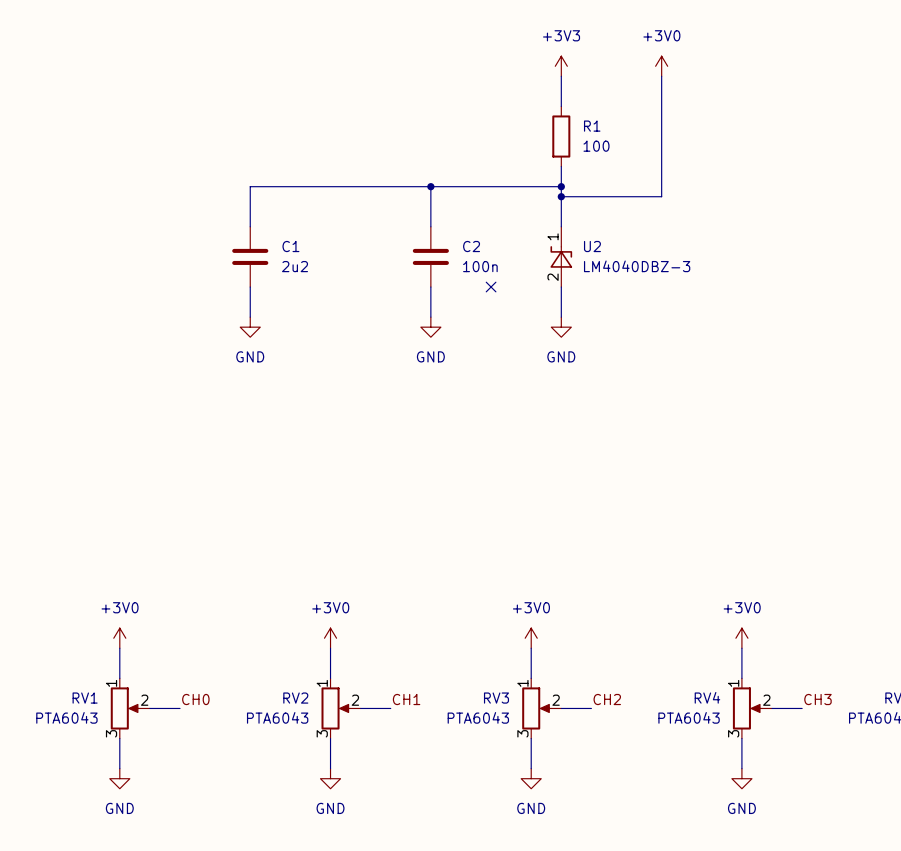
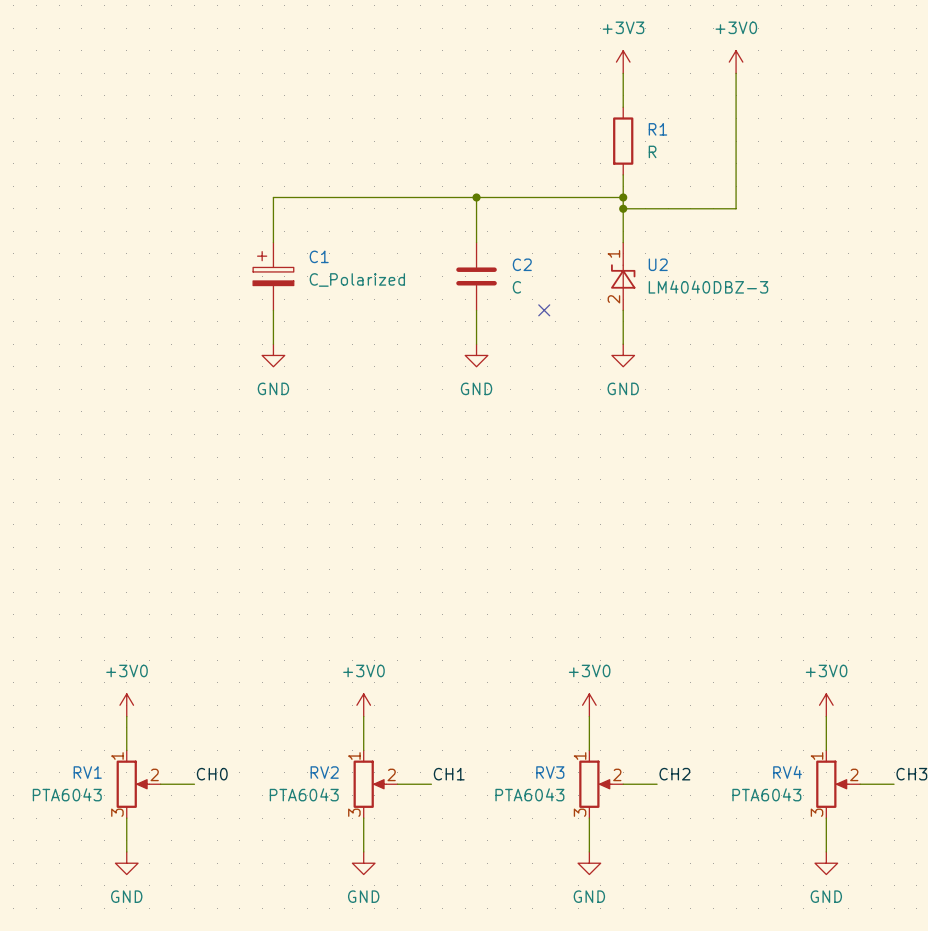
R1 value: 100 (596, 146) -> R (652, 151)
C1 symbol: [232, 226, 269, 288] -> [253, 242, 294, 311]
C1 value: 2u2 (295, 266) -> C_Polarized (357, 279)
C2 value: 100n (480, 266) -> C (516, 287)

